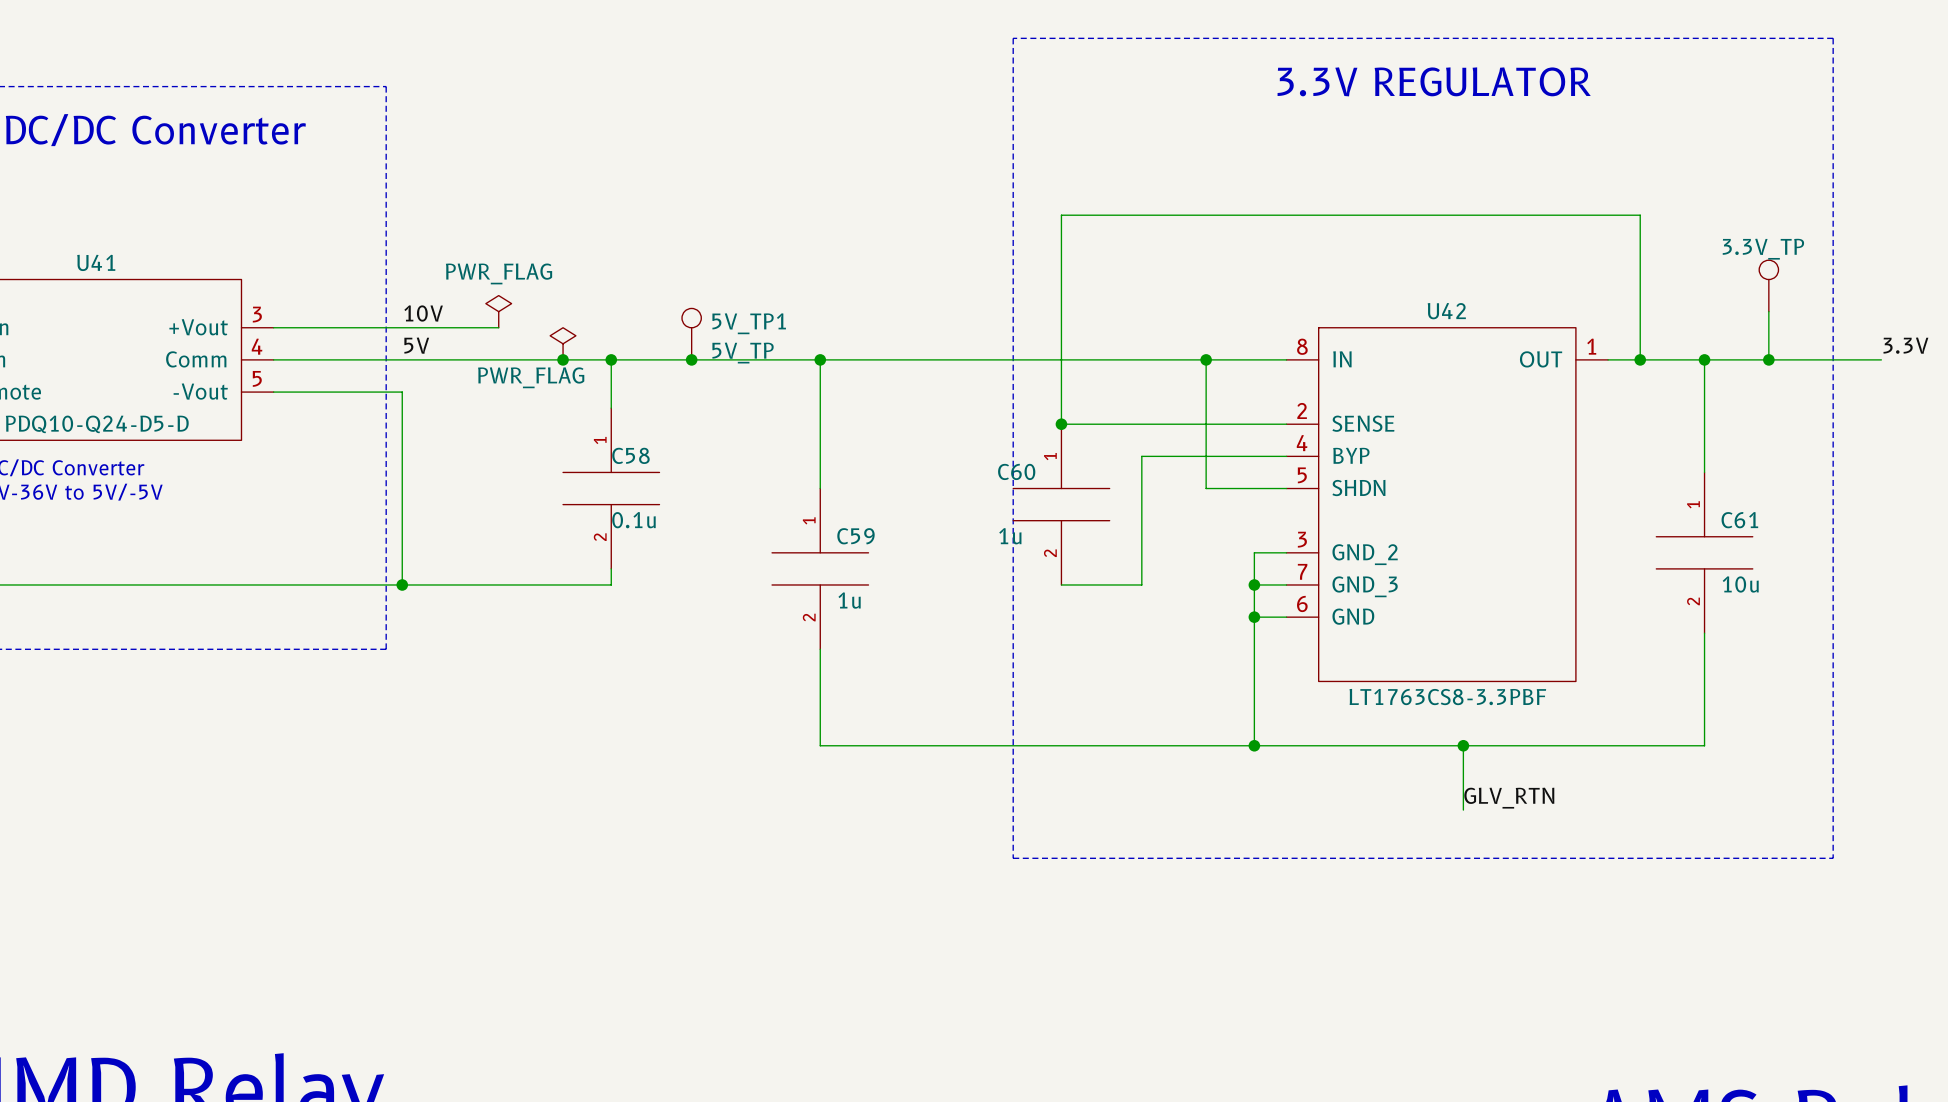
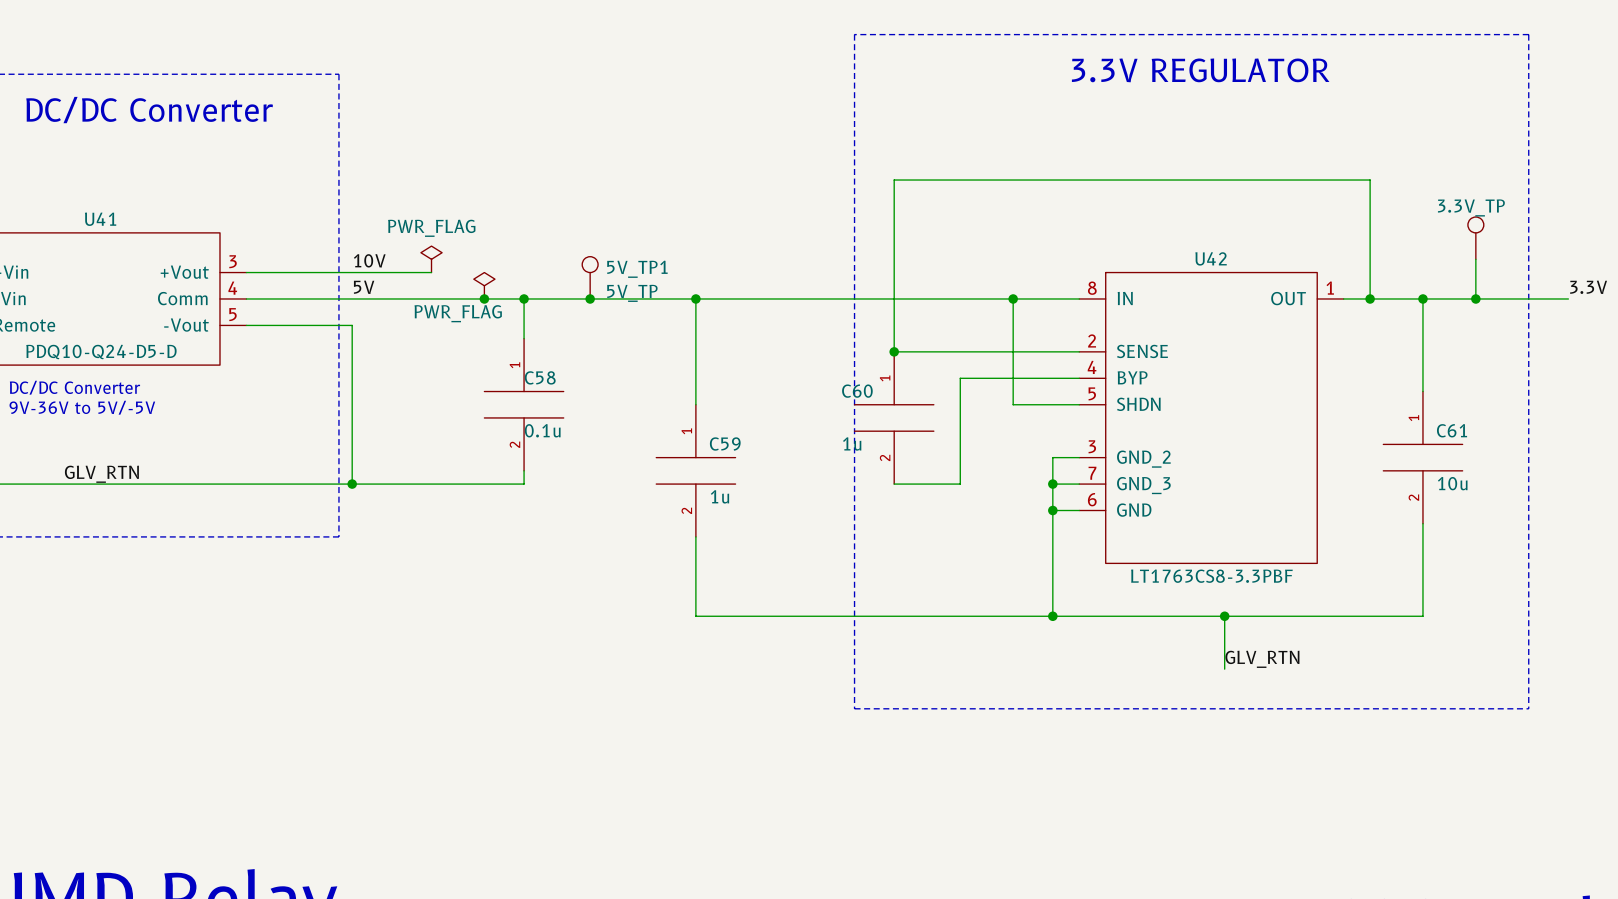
label: none -> GLV_RTN (101, 474)

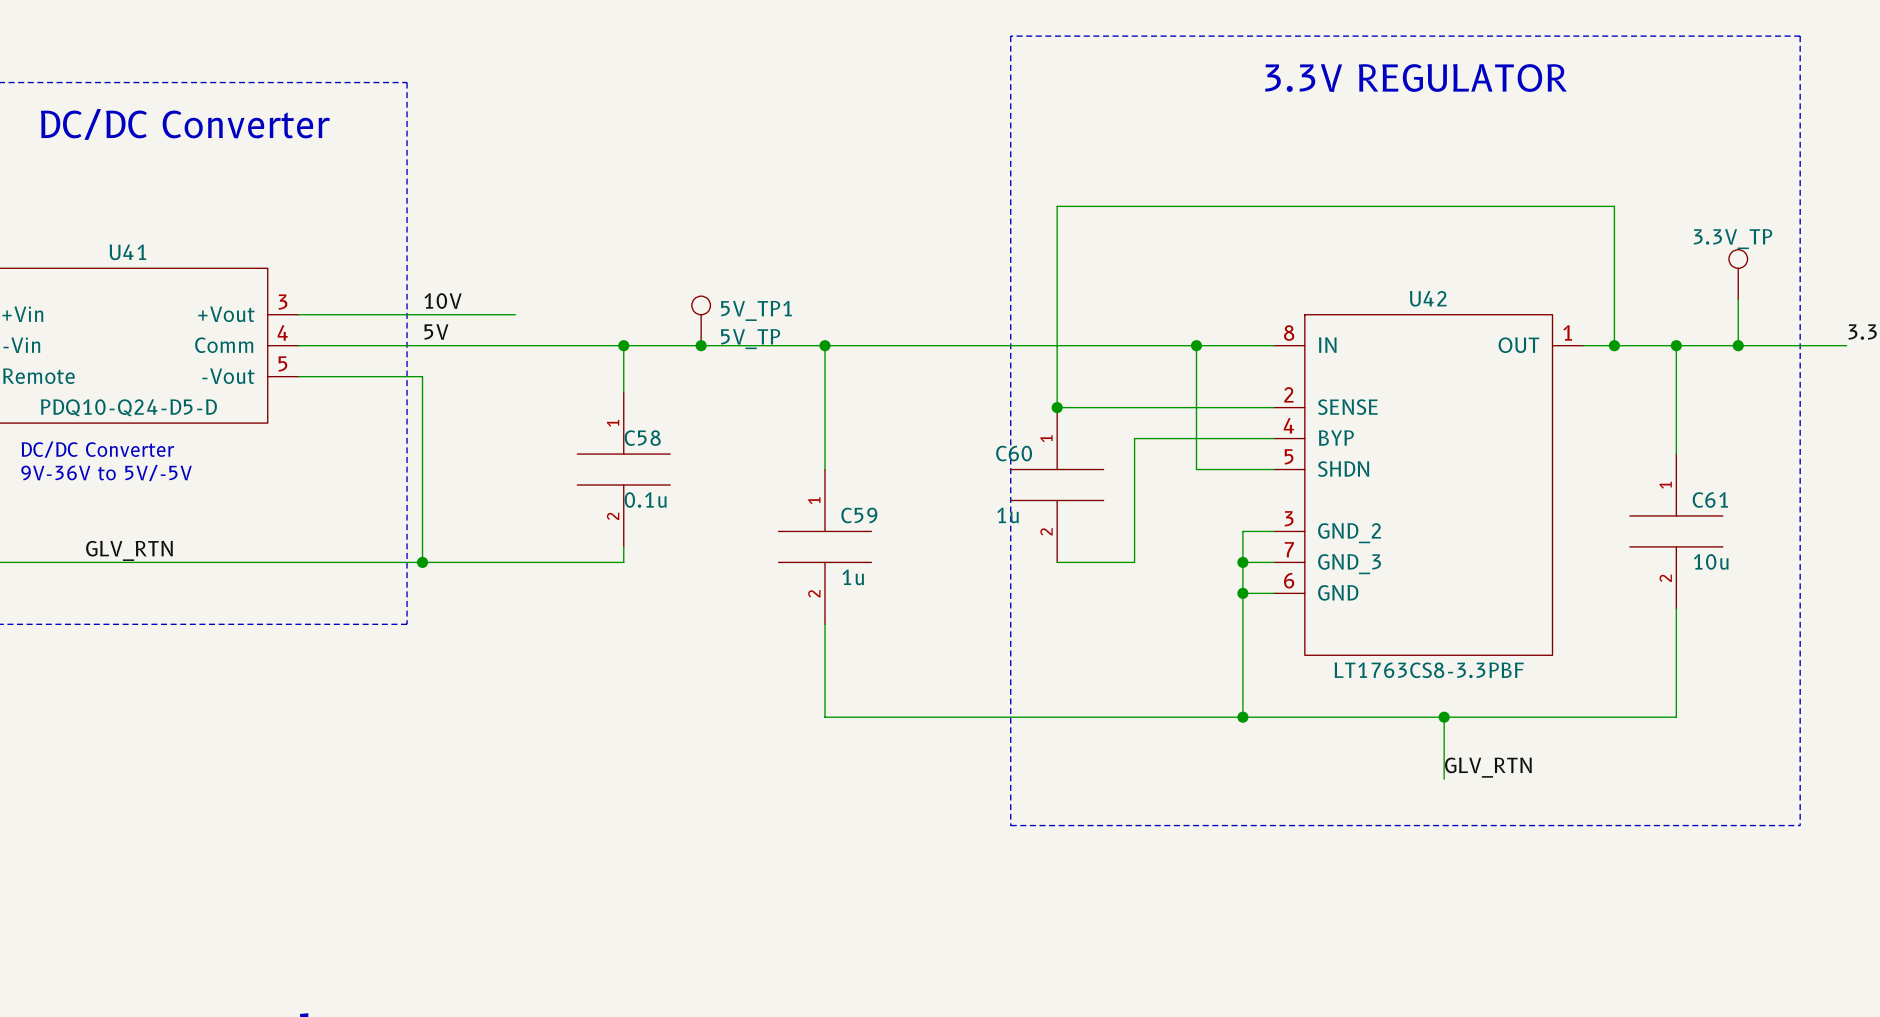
power symbol: PWR_FLAG (431, 259) -> none
power symbol: PWR_FLAG (484, 285) -> none
junction: (484, 298) -> none

